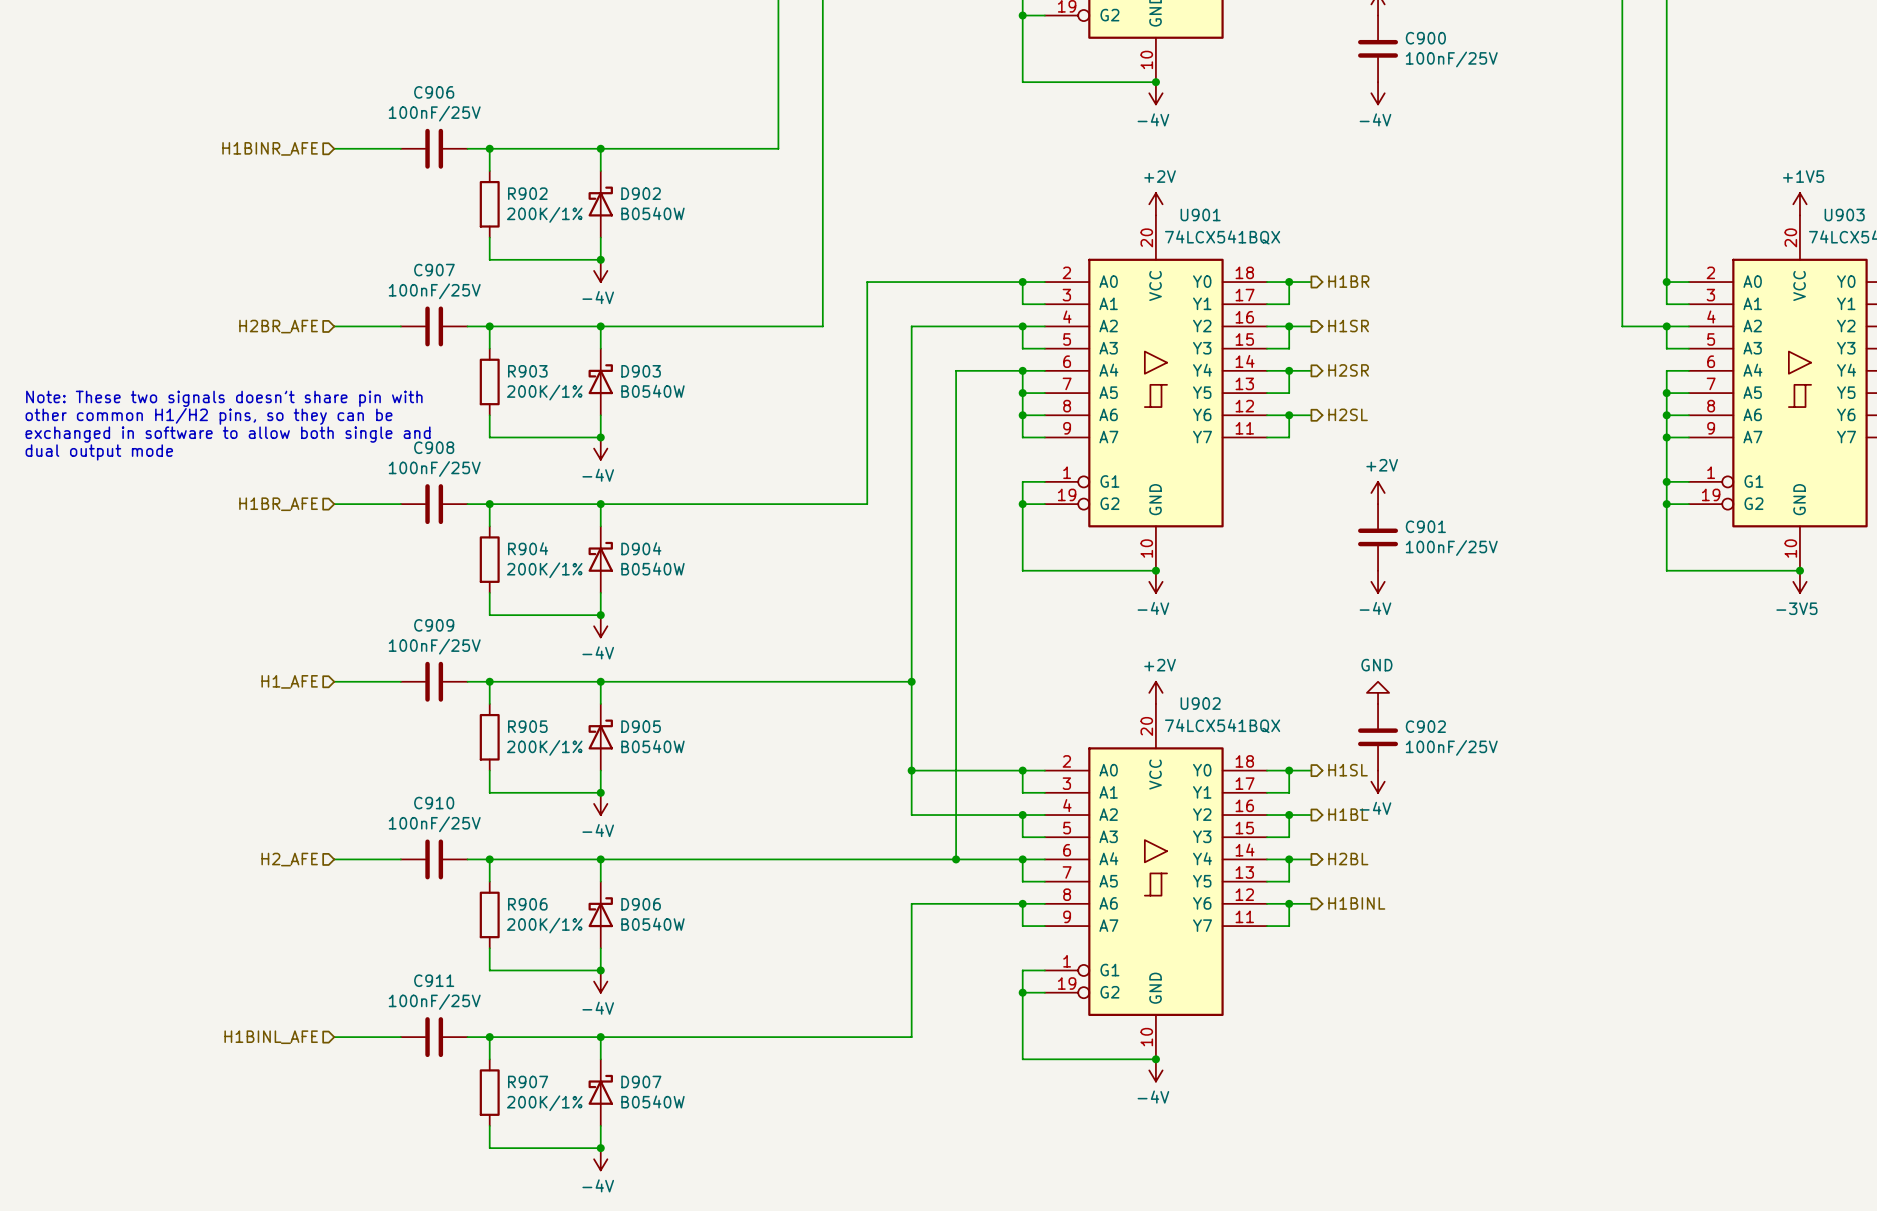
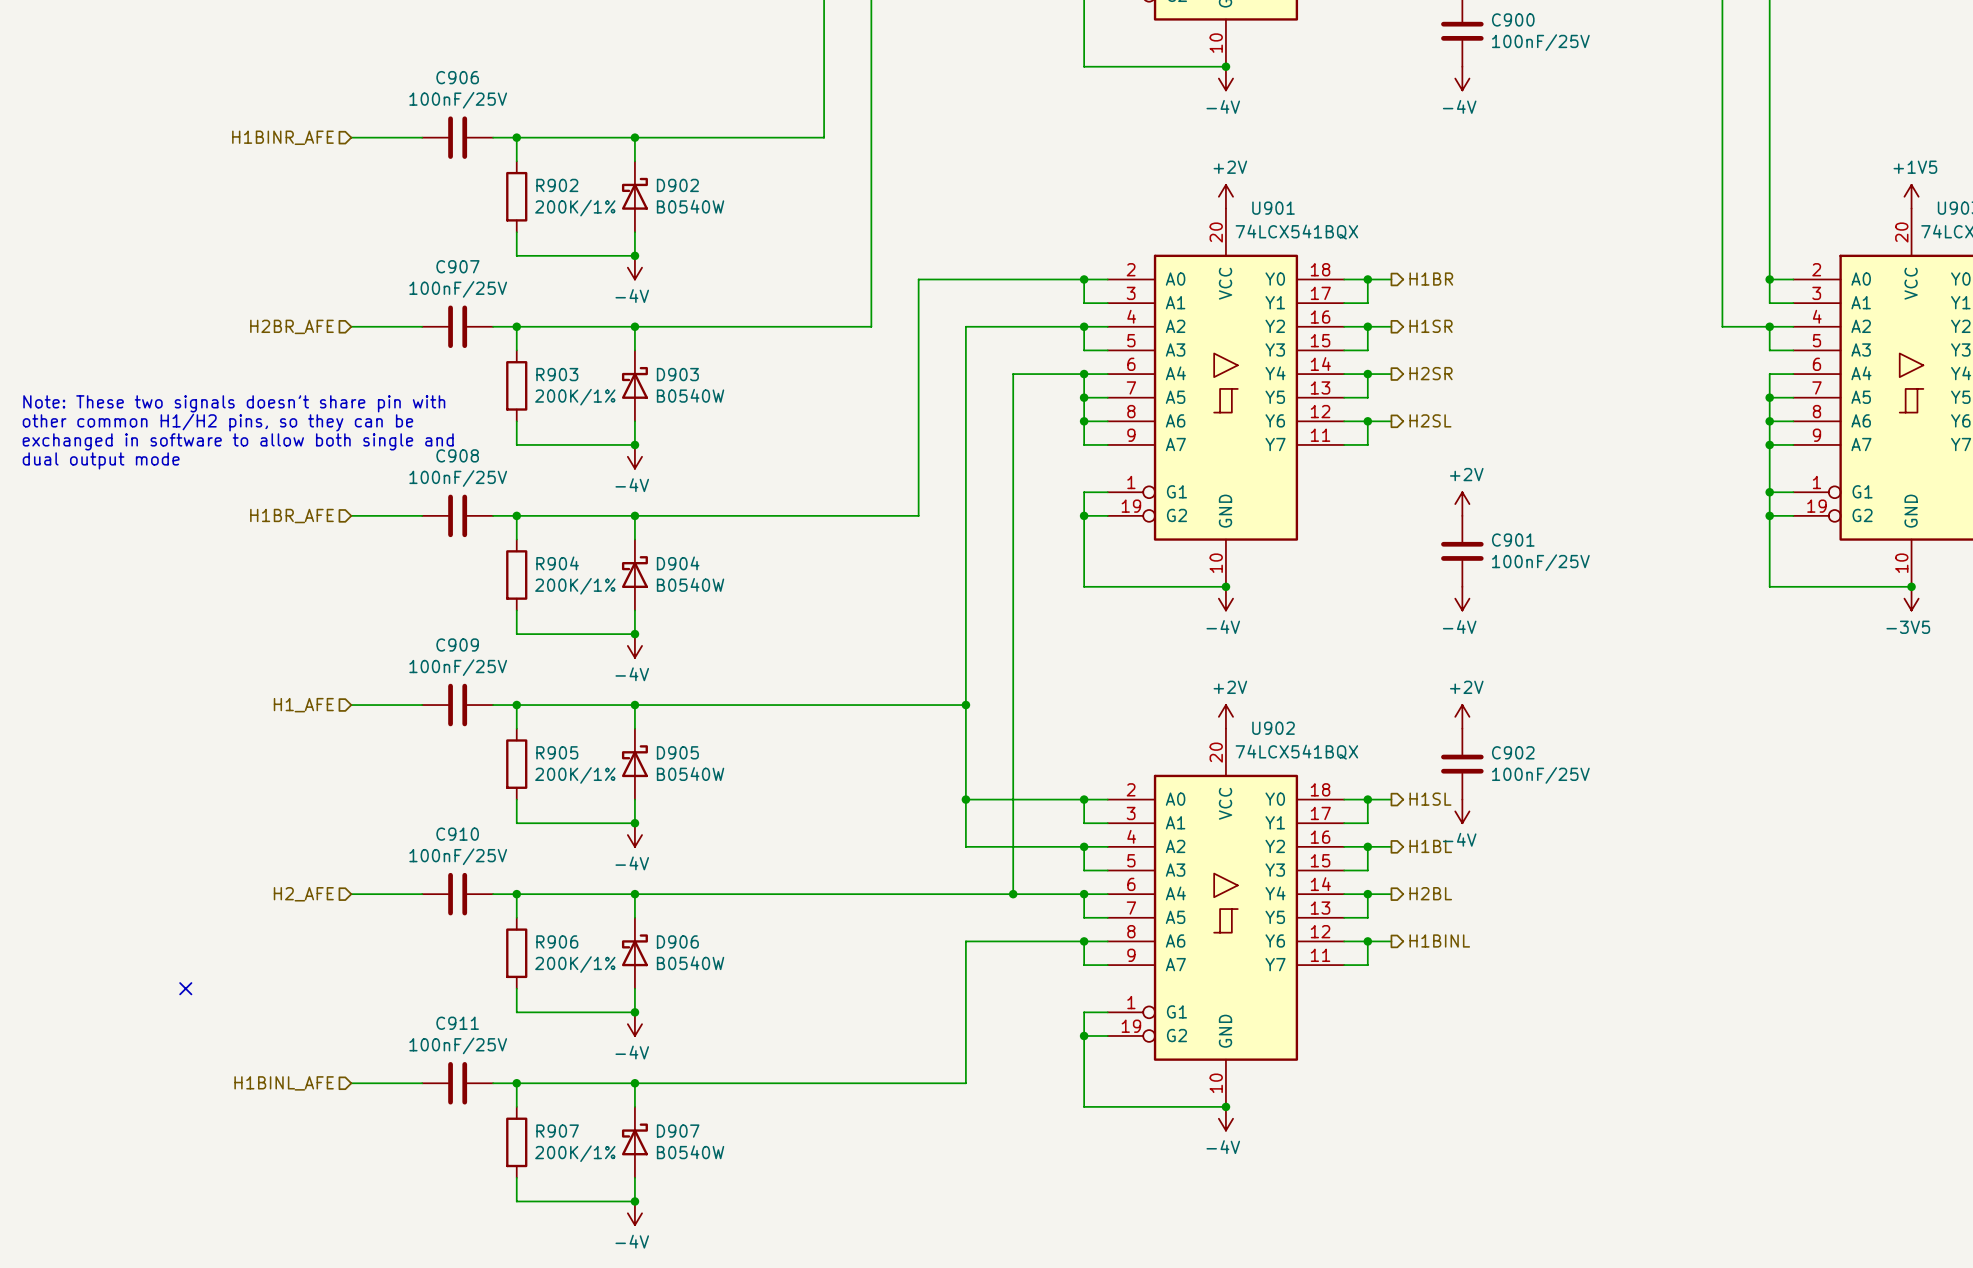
power symbol: GND (1378, 692) -> +2V (1462, 716)
no-connect mark: none -> (185, 988)

